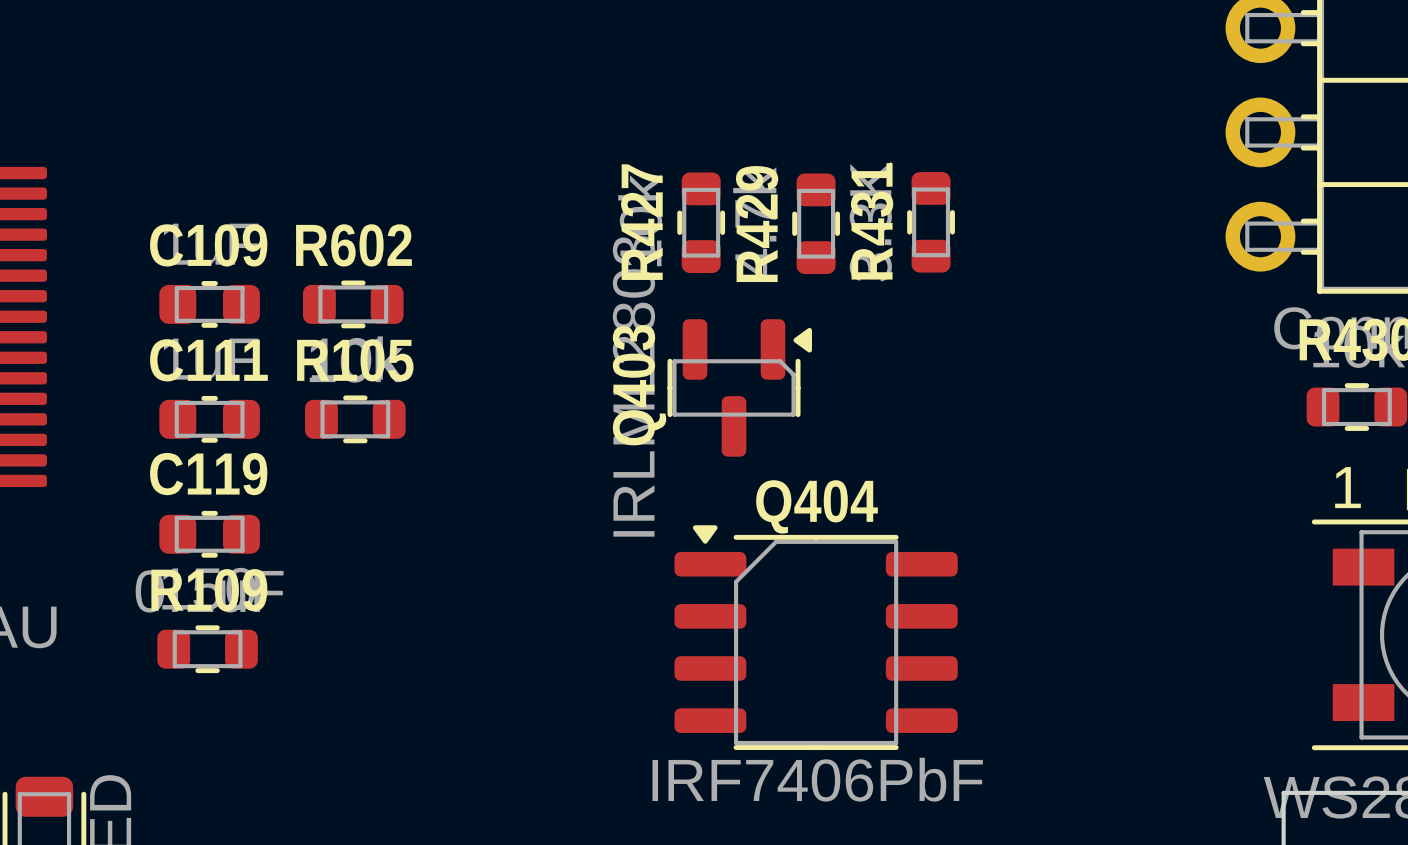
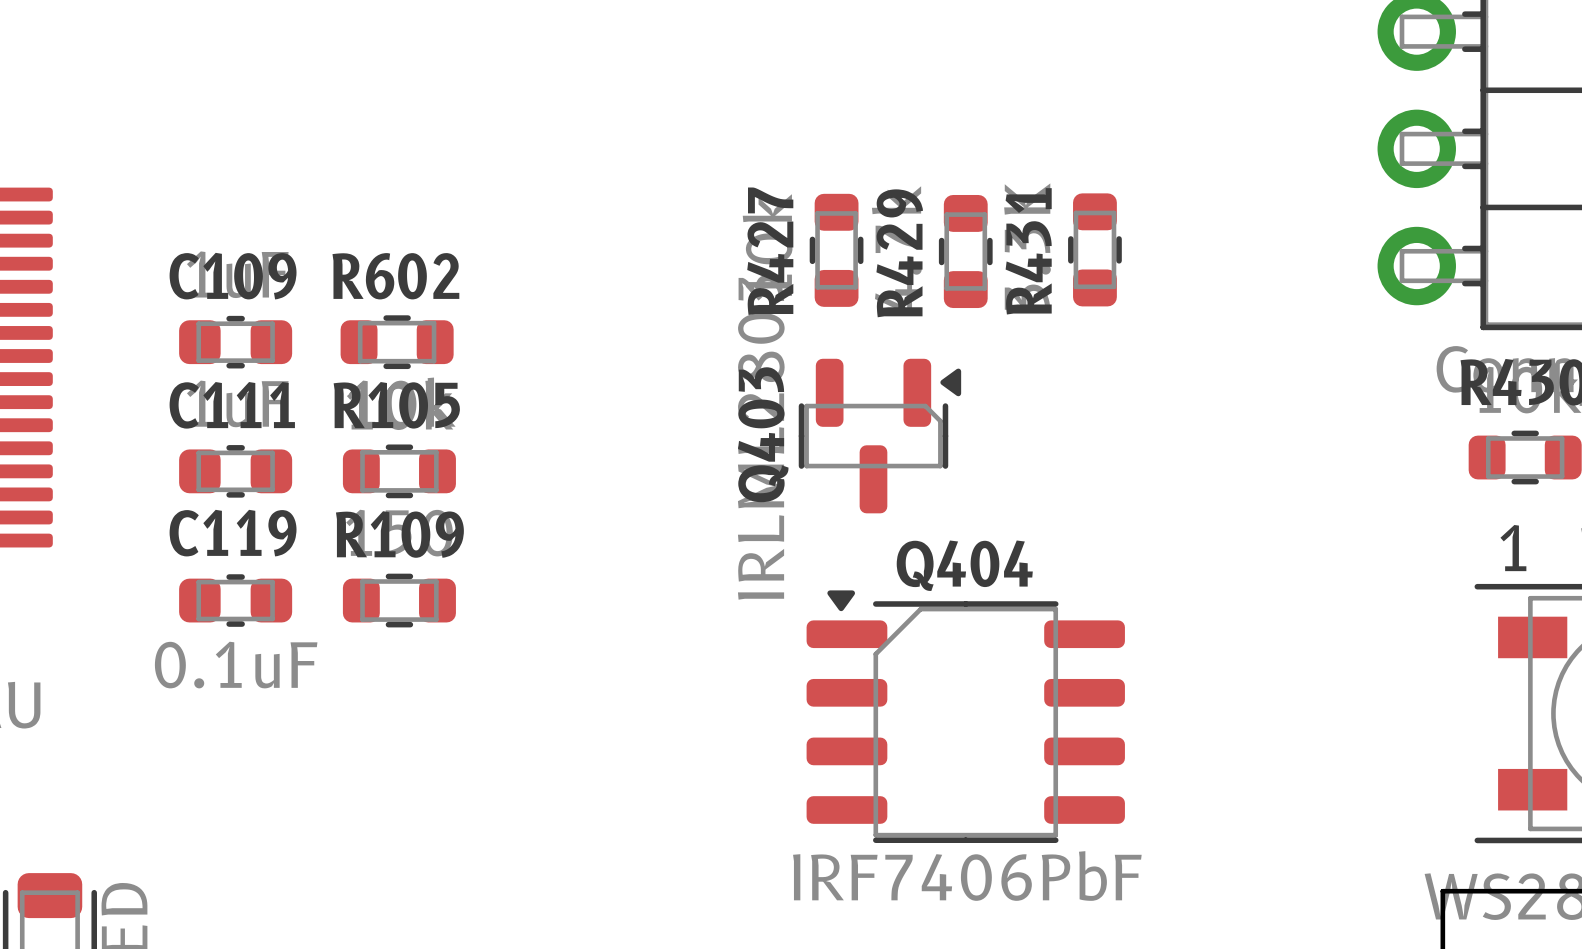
R427 position: (701, 222) -> (836, 250)
R431 position: (931, 222) -> (1094, 249)
R429 position: (816, 223) -> (965, 251)
Q403 position: (739, 387) -> (879, 436)
Q404 position: (816, 637) -> (965, 716)
R109 position: (207, 649) -> (399, 600)

